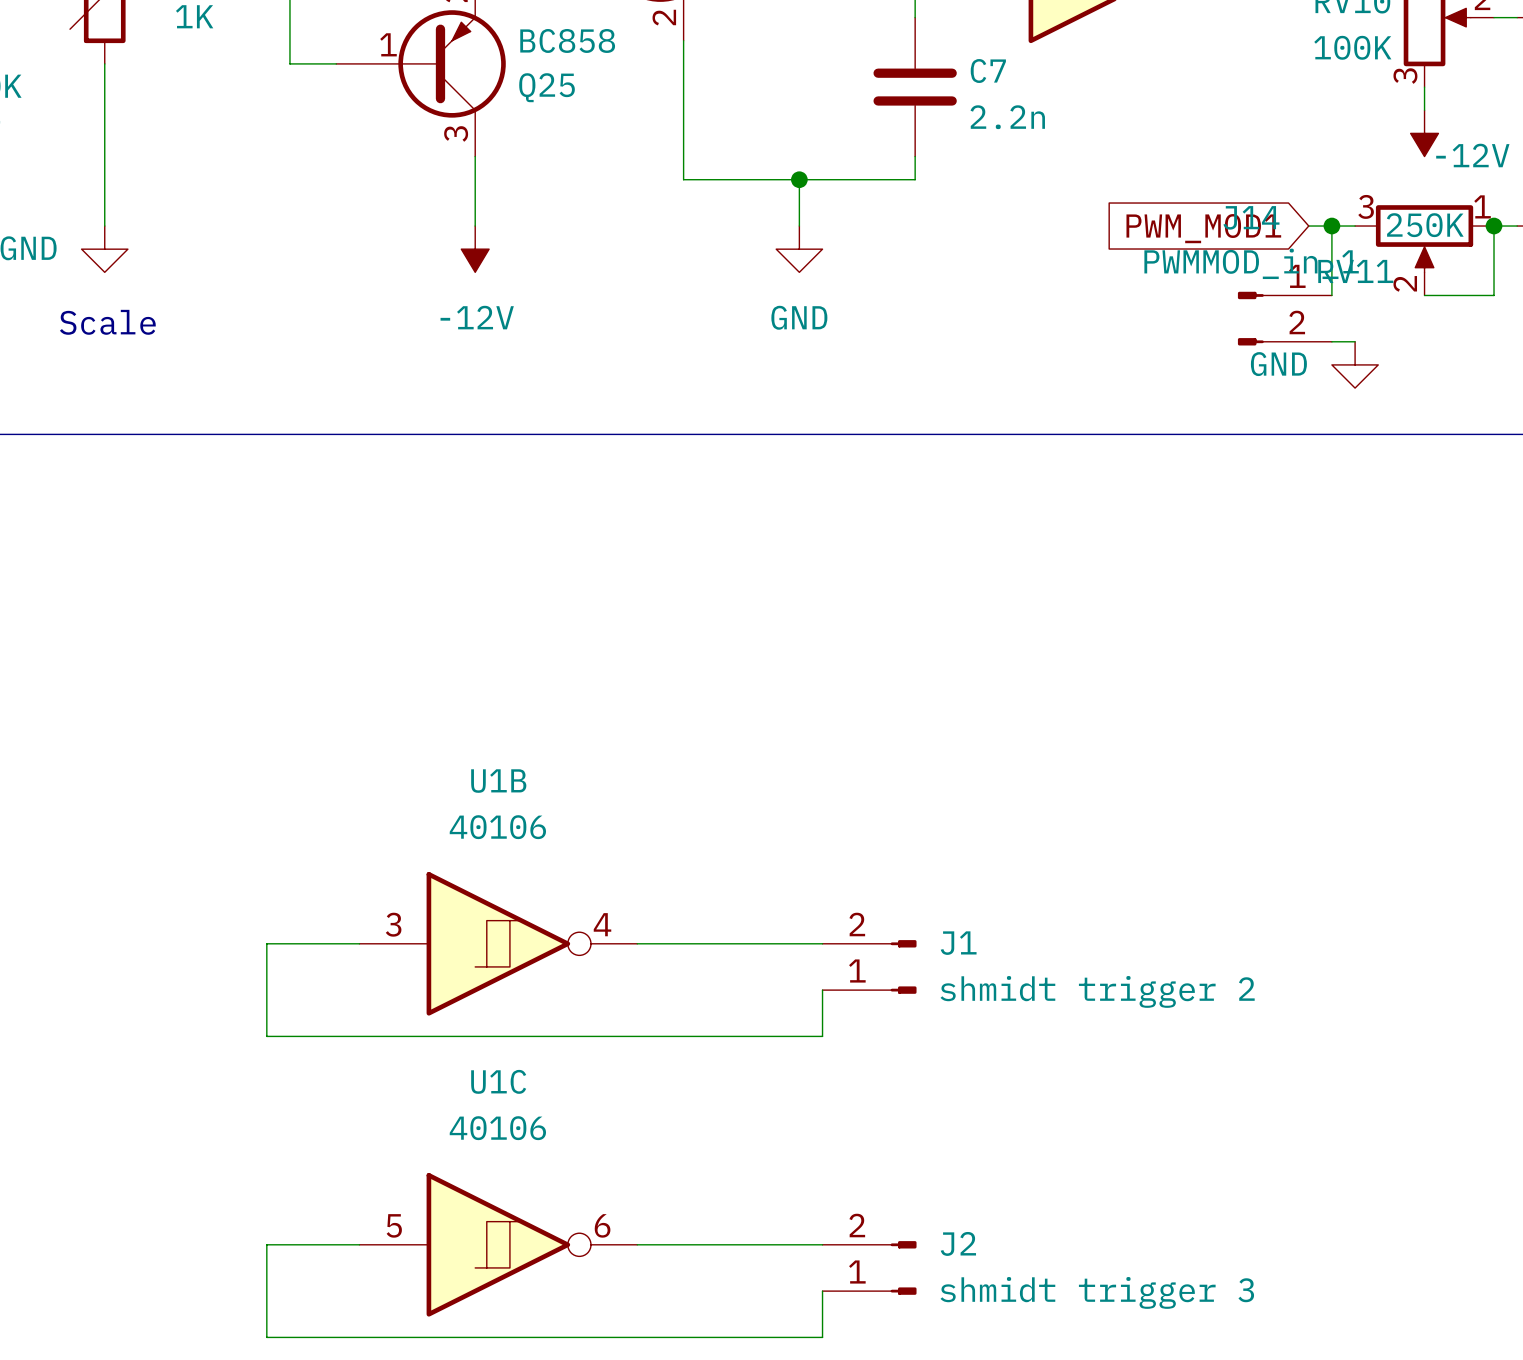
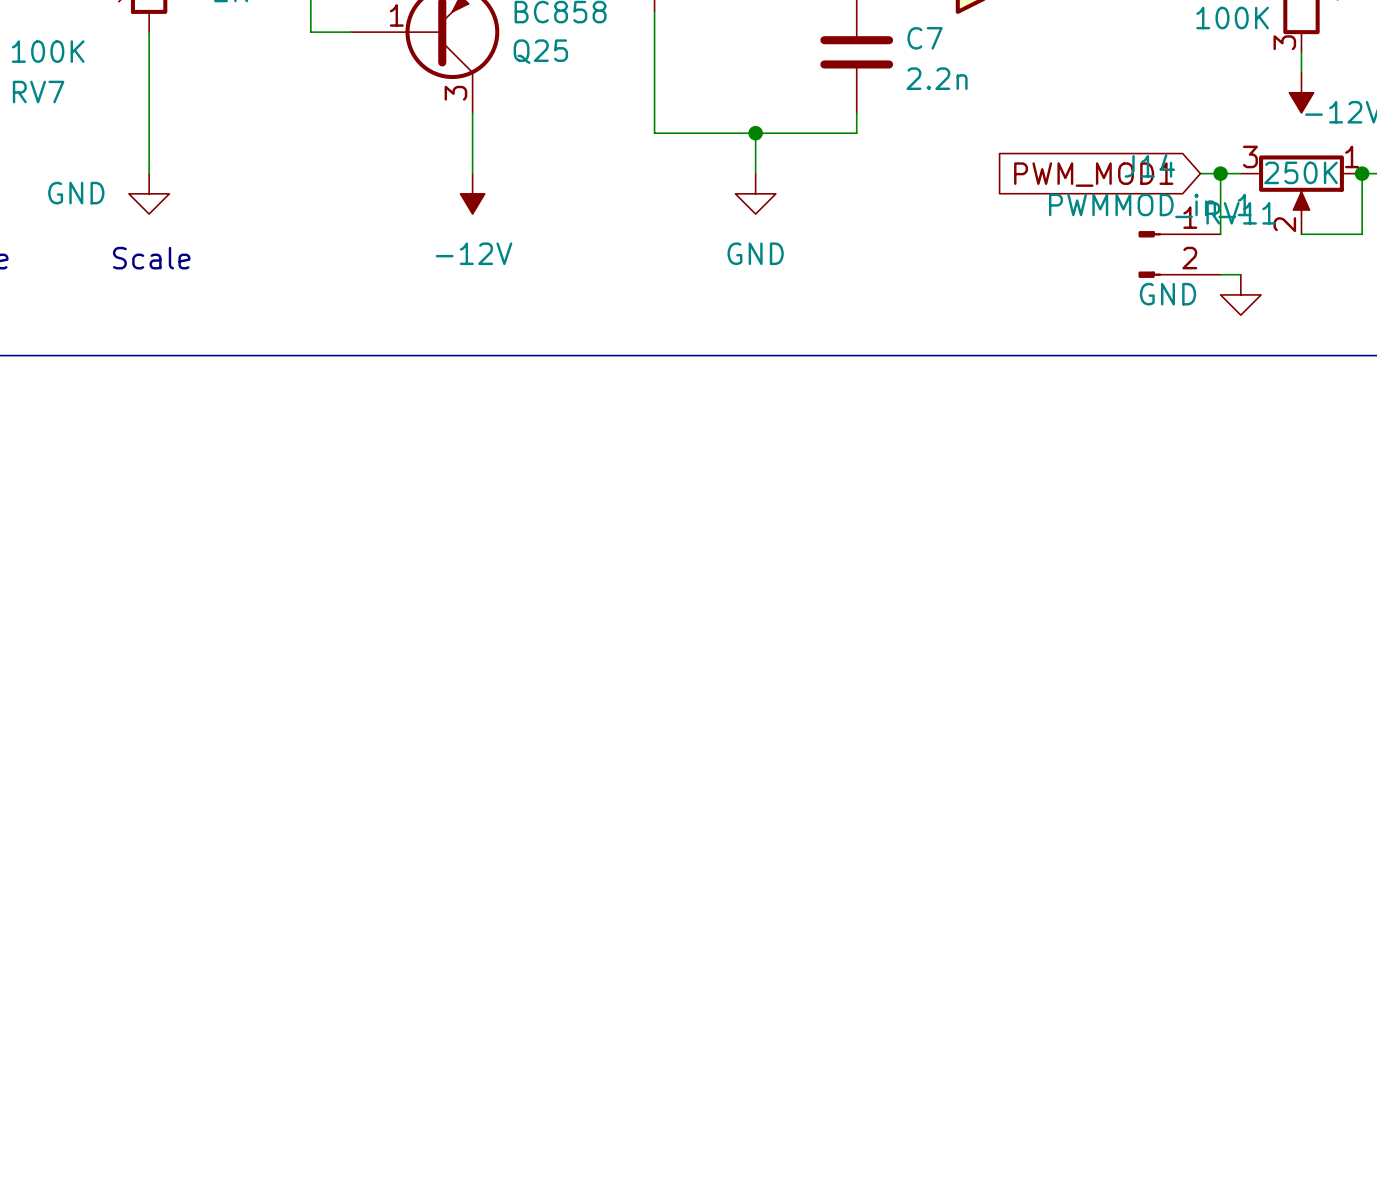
wire: (359, 943) (266, 943) (266, 1036) (822, 1036) (822, 990) -> none
U1B: 40106 (498, 943) -> none
wire: (637, 943) (822, 943) -> none
J1: shmidt trigger 2 (869, 966) -> none
wire: (359, 1244) (266, 1244) (266, 1337) (822, 1337) (822, 1291) -> none
U1C: 40106 (498, 1244) -> none
wire: (637, 1244) (822, 1244) -> none
J2: shmidt trigger 3 (869, 1267) -> none

